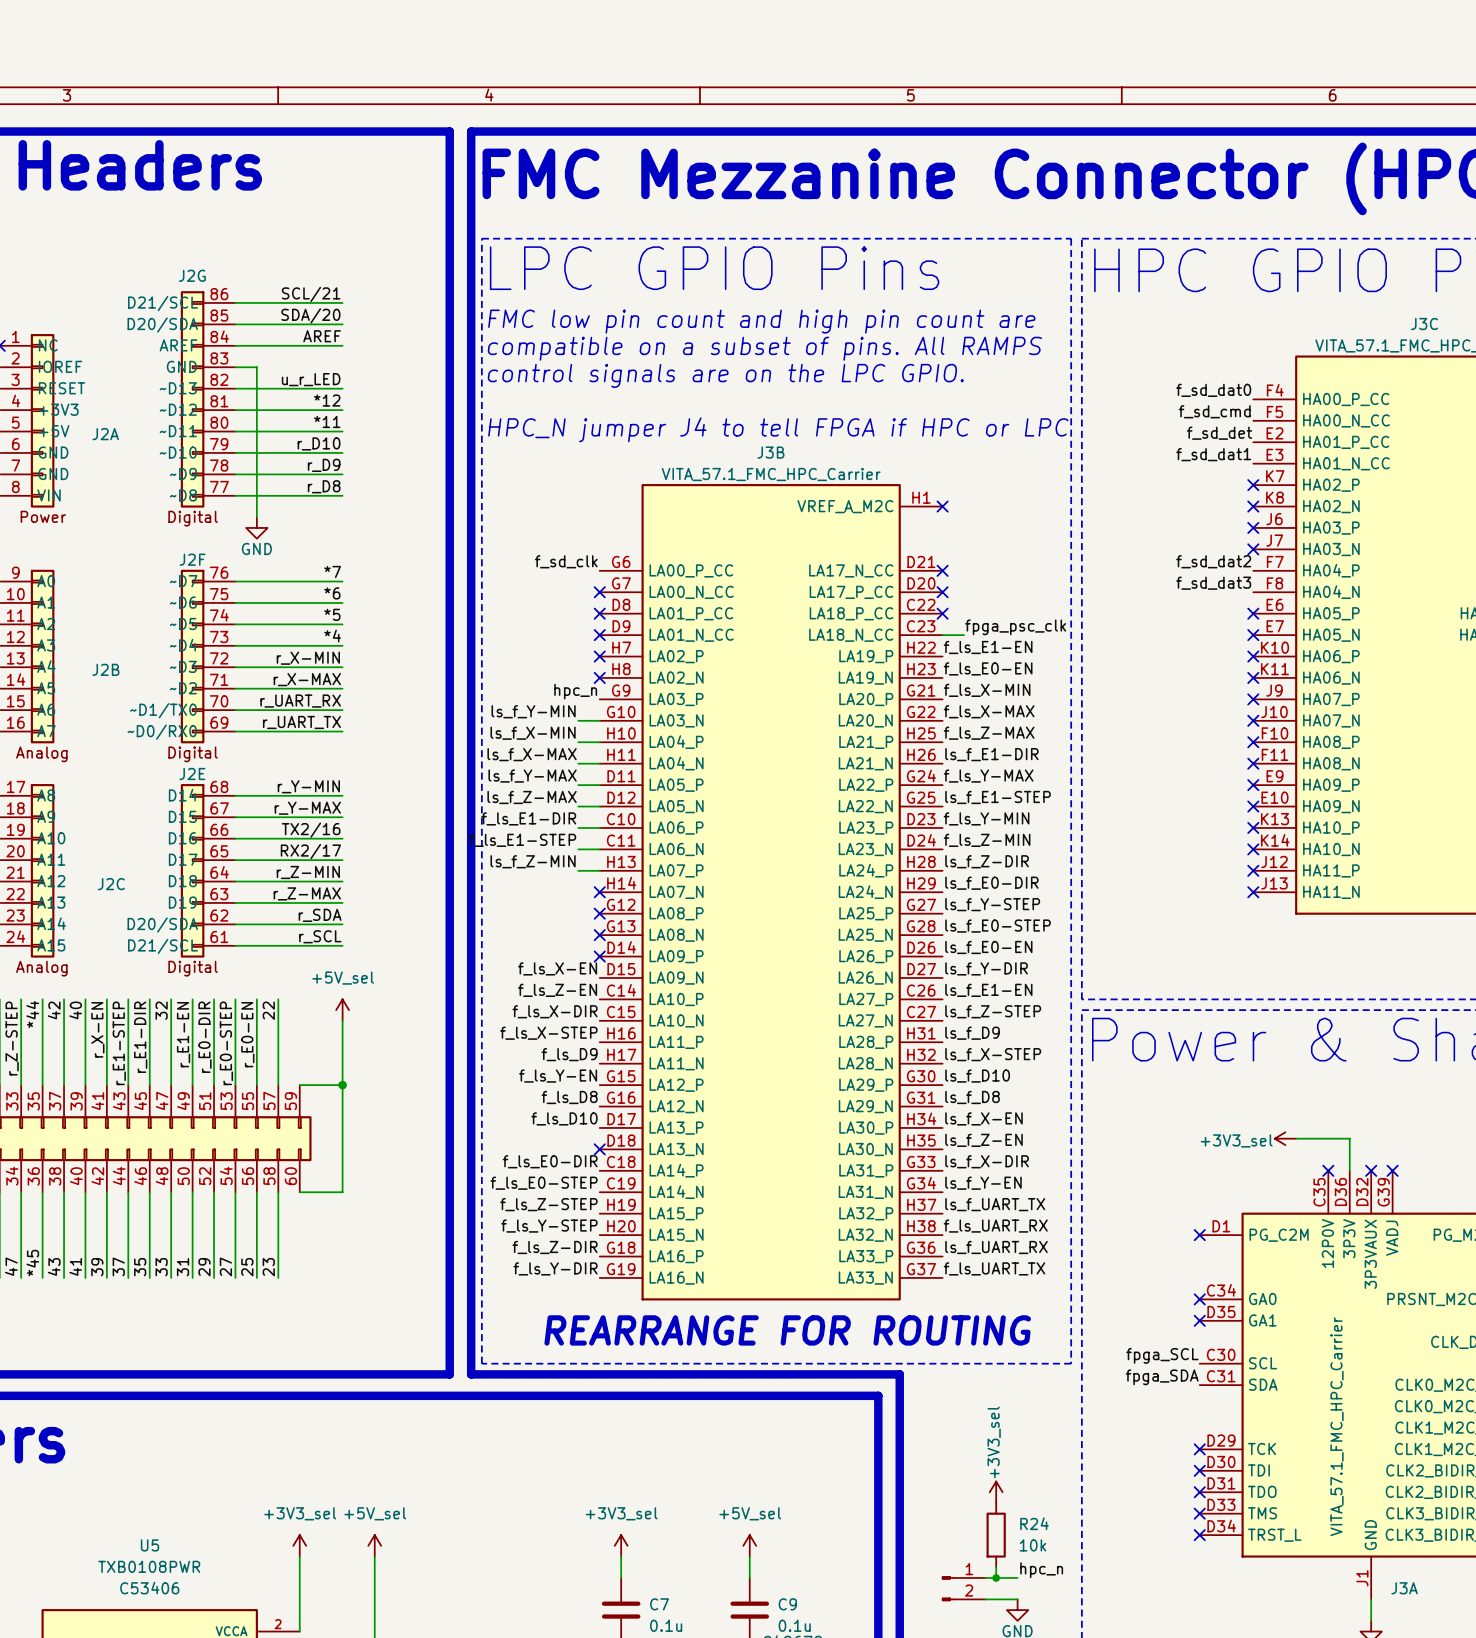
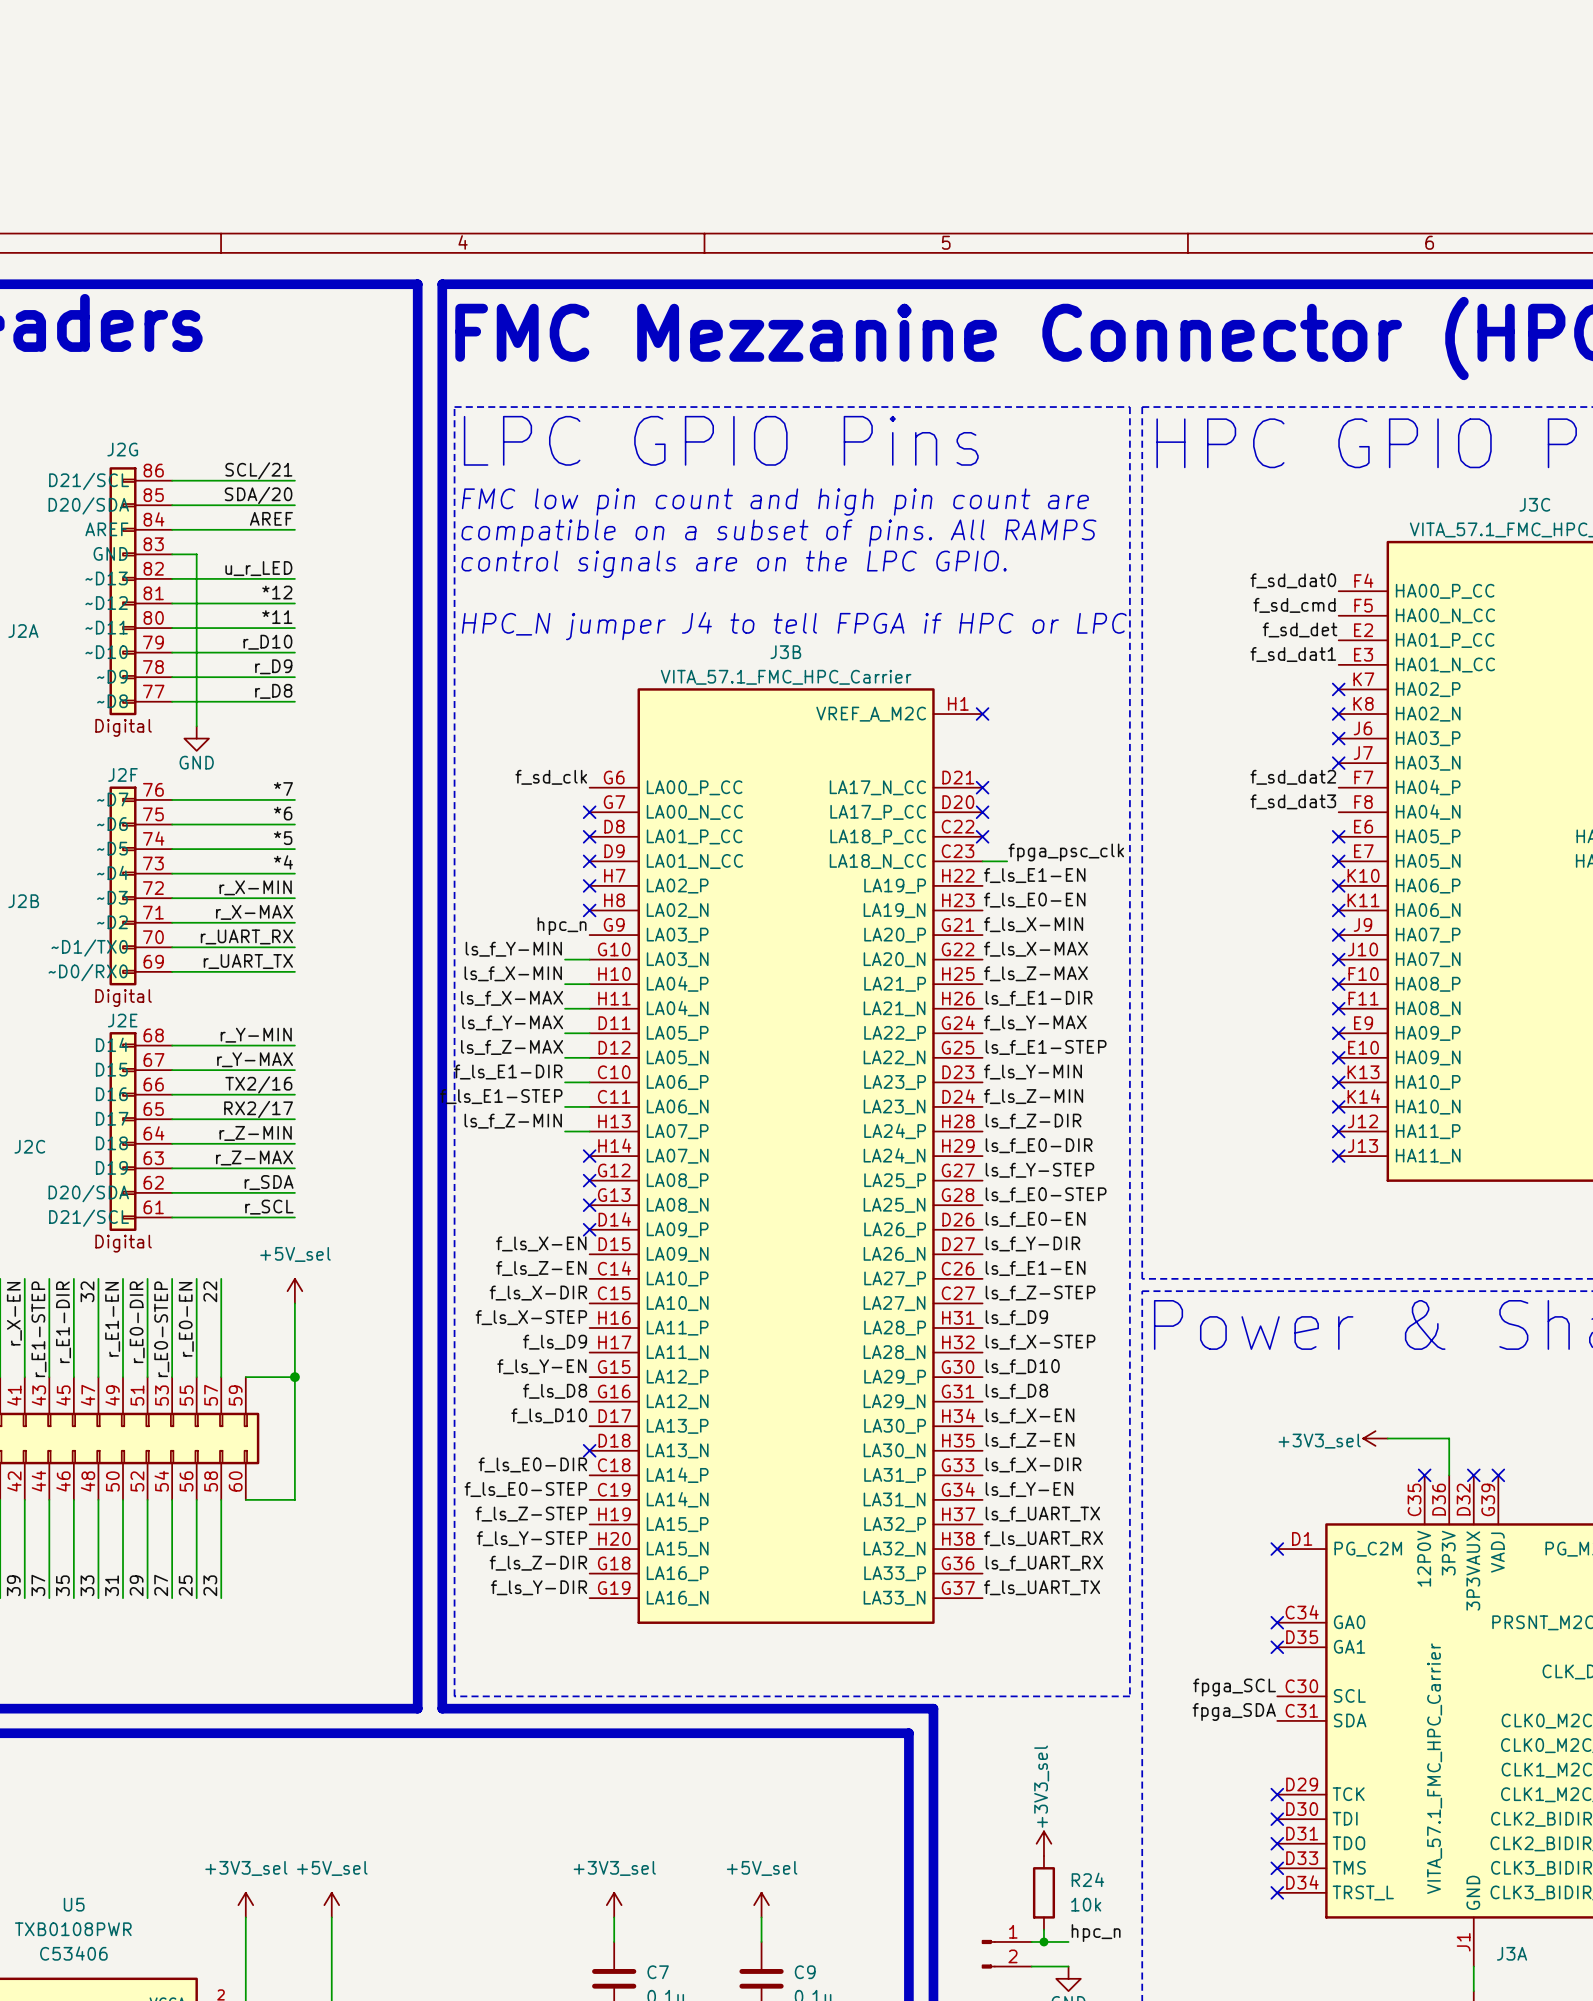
text: REARRANGE FOR ROUTING (787, 1330) -> none

